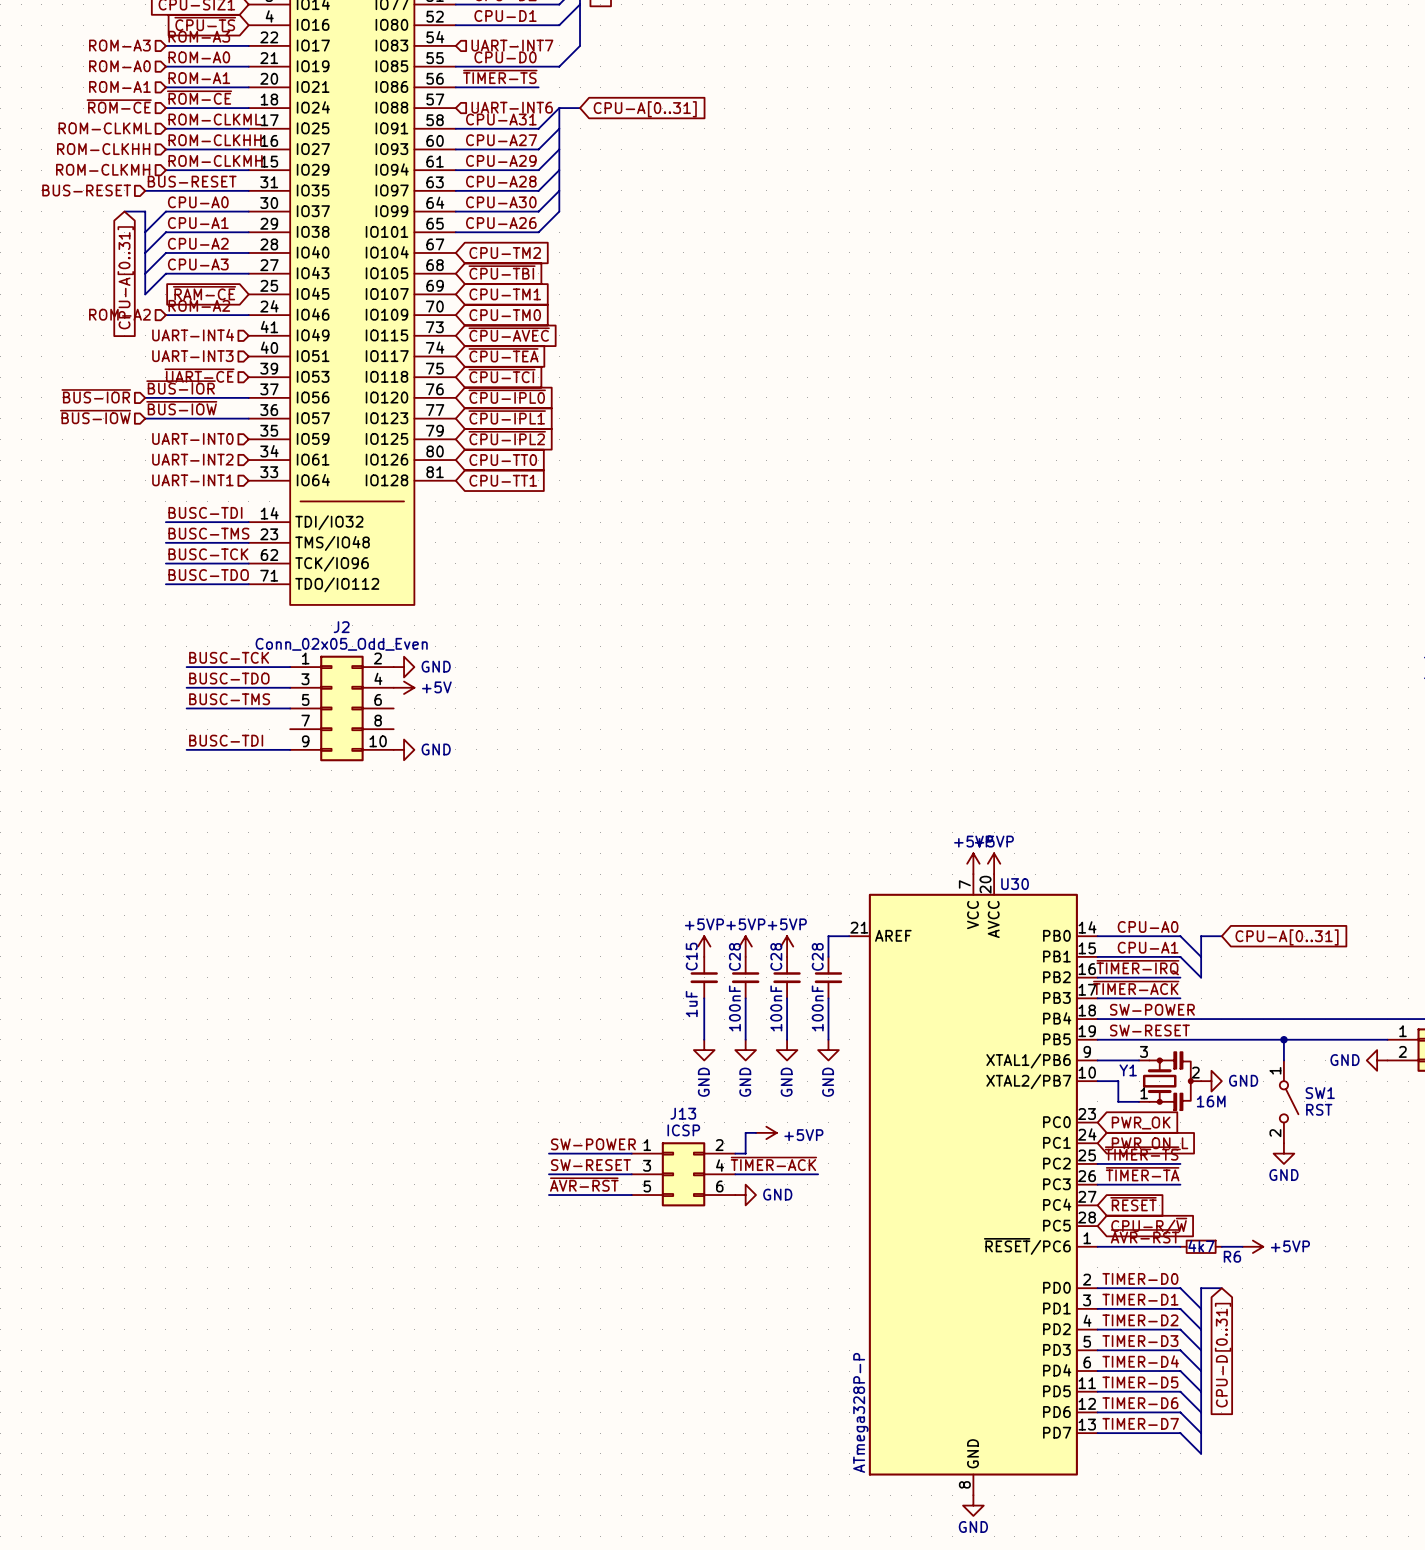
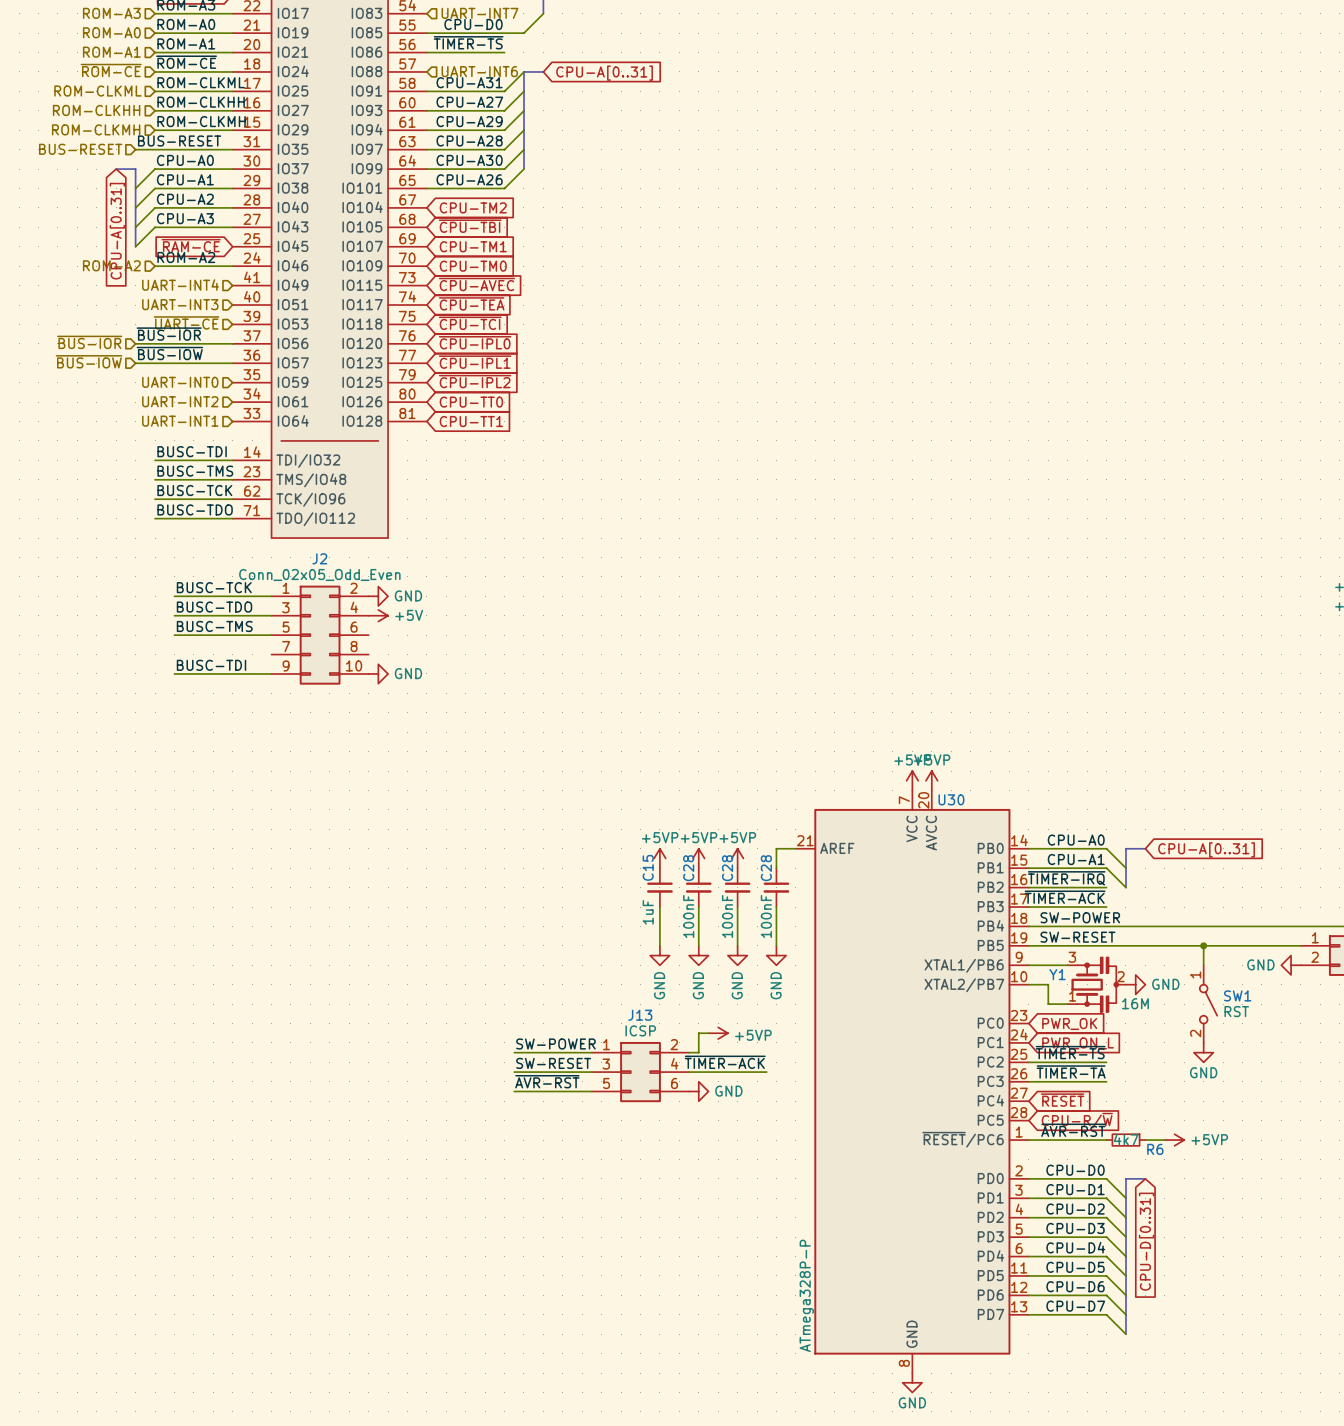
label: TIMER-D0 (1140, 1278) -> CPU-D0 (1075, 1170)
label: TIMER-D1 (1140, 1299) -> CPU-D1 (1075, 1189)
label: TIMER-D2 (1140, 1320) -> CPU-D2 (1075, 1209)
label: TIMER-D3 (1140, 1341) -> CPU-D3 (1075, 1228)
label: TIMER-D4 (1140, 1361) -> CPU-D4 (1075, 1247)
label: TIMER-D5 (1140, 1382) -> CPU-D5 (1075, 1267)
label: TIMER-D6 (1140, 1403) -> CPU-D6 (1075, 1286)
label: TIMER-D7 (1140, 1423) -> CPU-D7 (1075, 1306)

